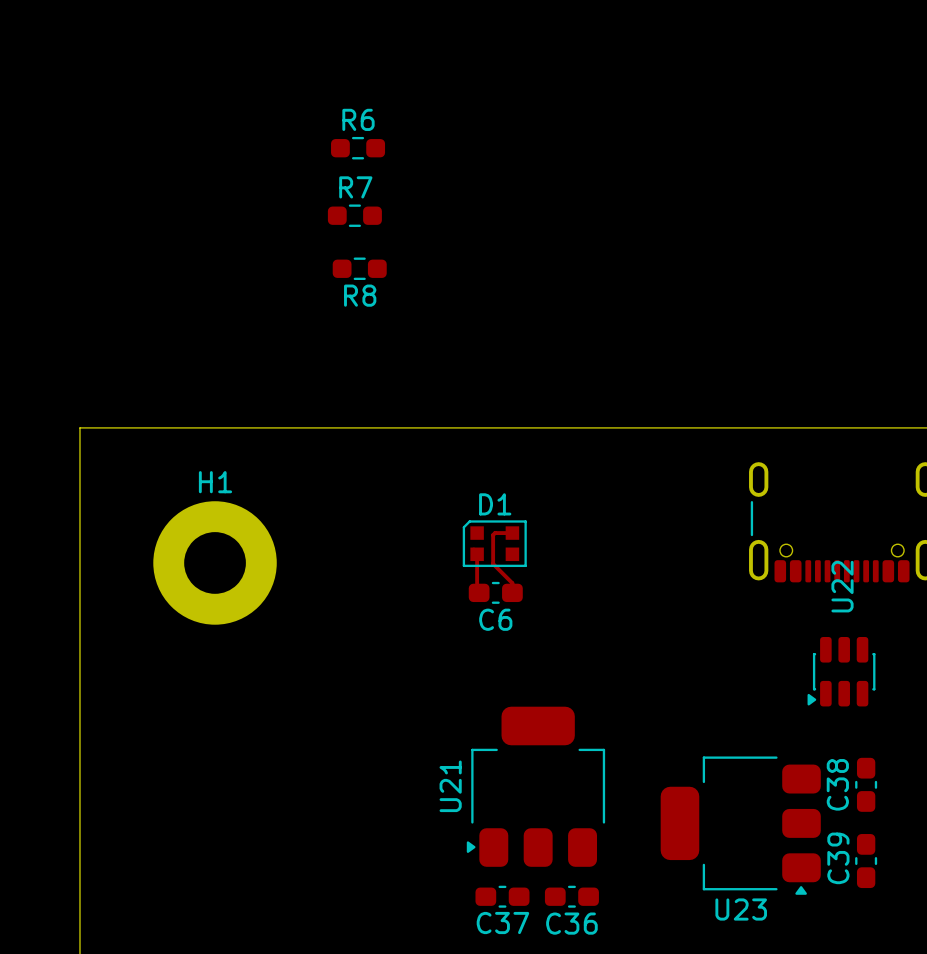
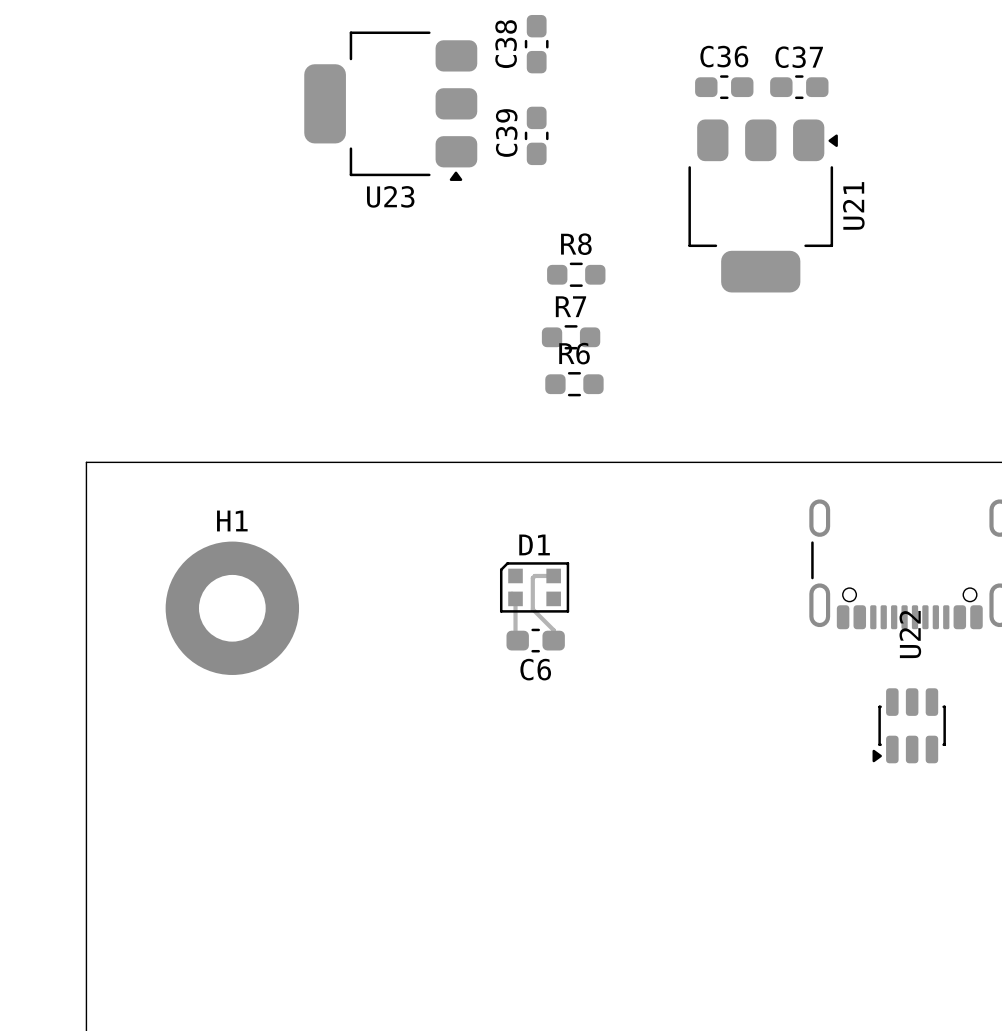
R6 position: (358, 148) -> (574, 384)
R7 position: (354, 215) -> (571, 337)
R8 position: (359, 268) -> (576, 274)
R8 name position: R8 (360, 295) -> R8 (576, 244)
C38 position: (866, 784) -> (536, 44)
U21 rotation: 0° (535, 786) -> 180° (763, 205)
U21 position: (535, 786) -> (763, 205)
U23 position: (740, 825) -> (390, 106)
C39 position: (866, 861) -> (536, 135)
C37 position: (502, 896) -> (799, 87)
C36 position: (571, 896) -> (724, 87)
C37 name position: C37 (502, 923) -> C37 (799, 57)
C36 name position: C36 (571, 923) -> C36 (724, 56)

